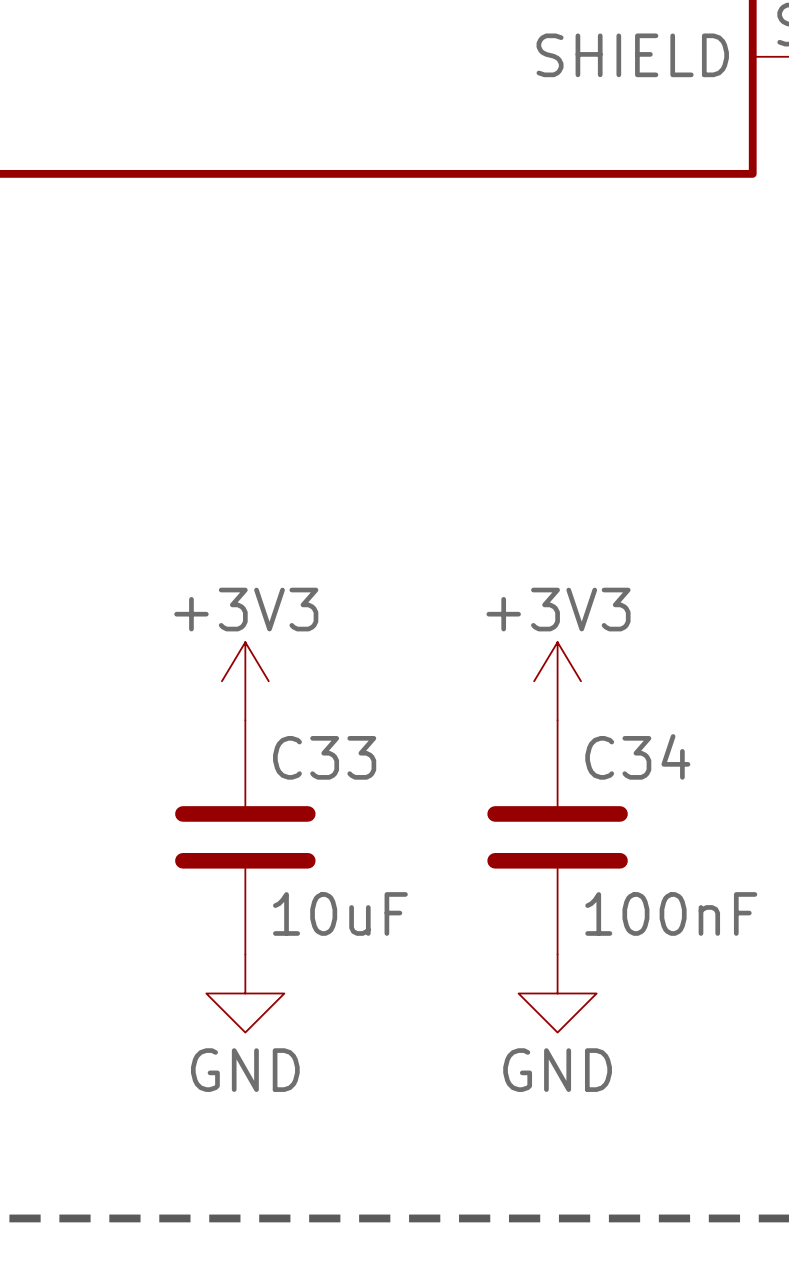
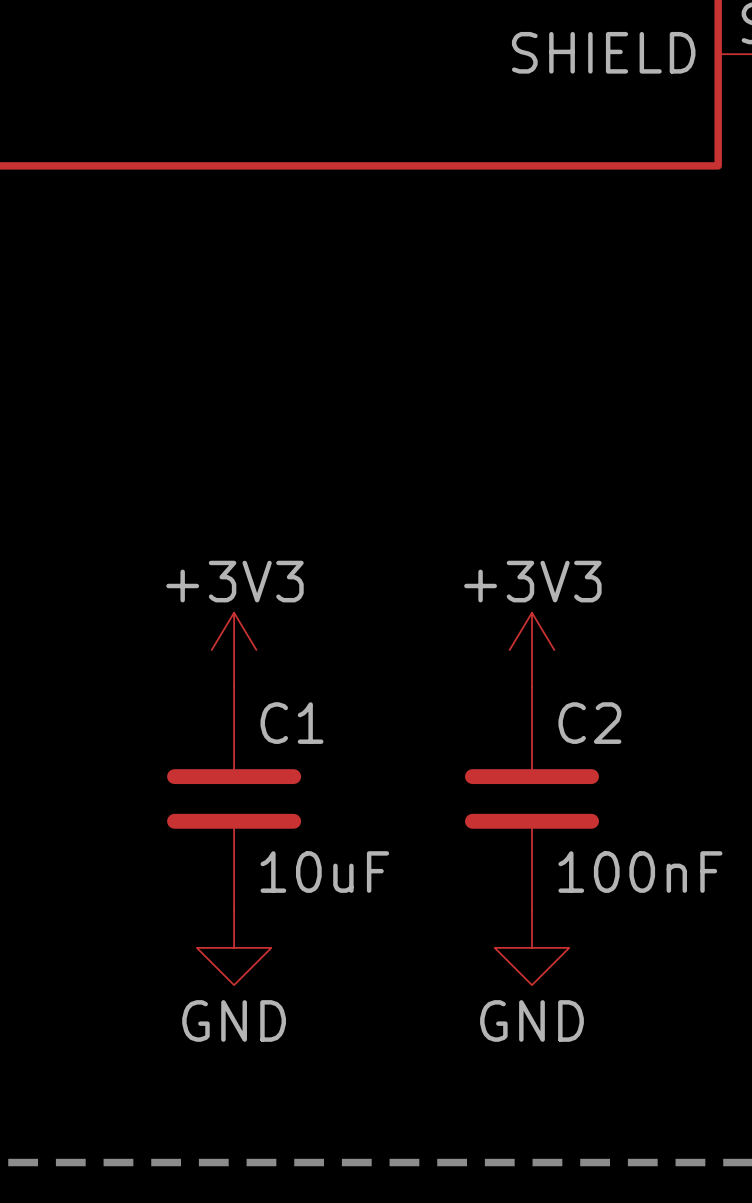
C34 name: C34 (637, 756) -> C2 (589, 723)
C33 name: C33 (324, 757) -> C1 (292, 723)

